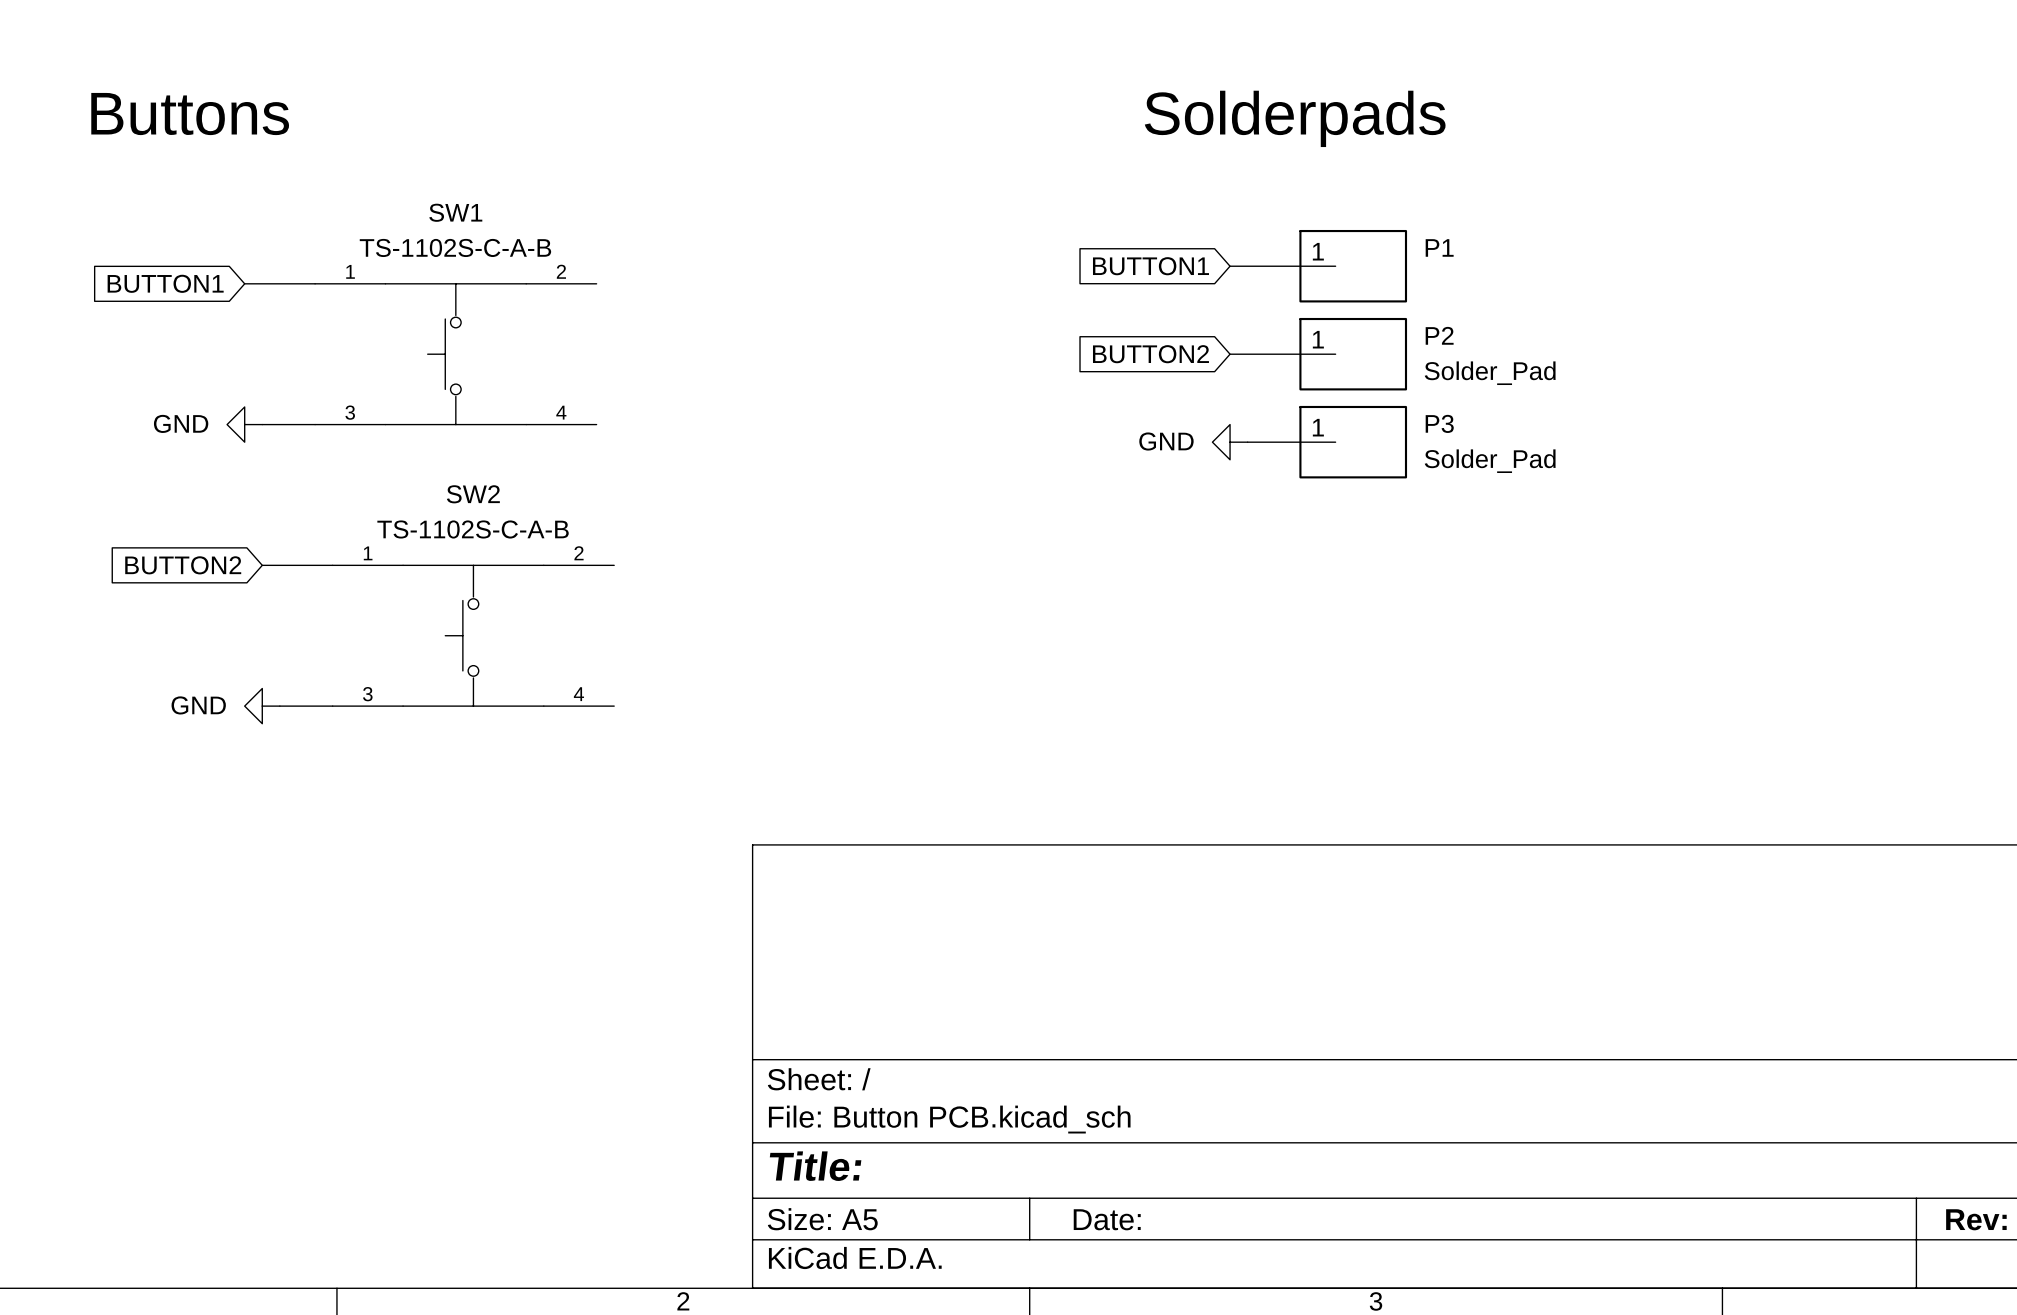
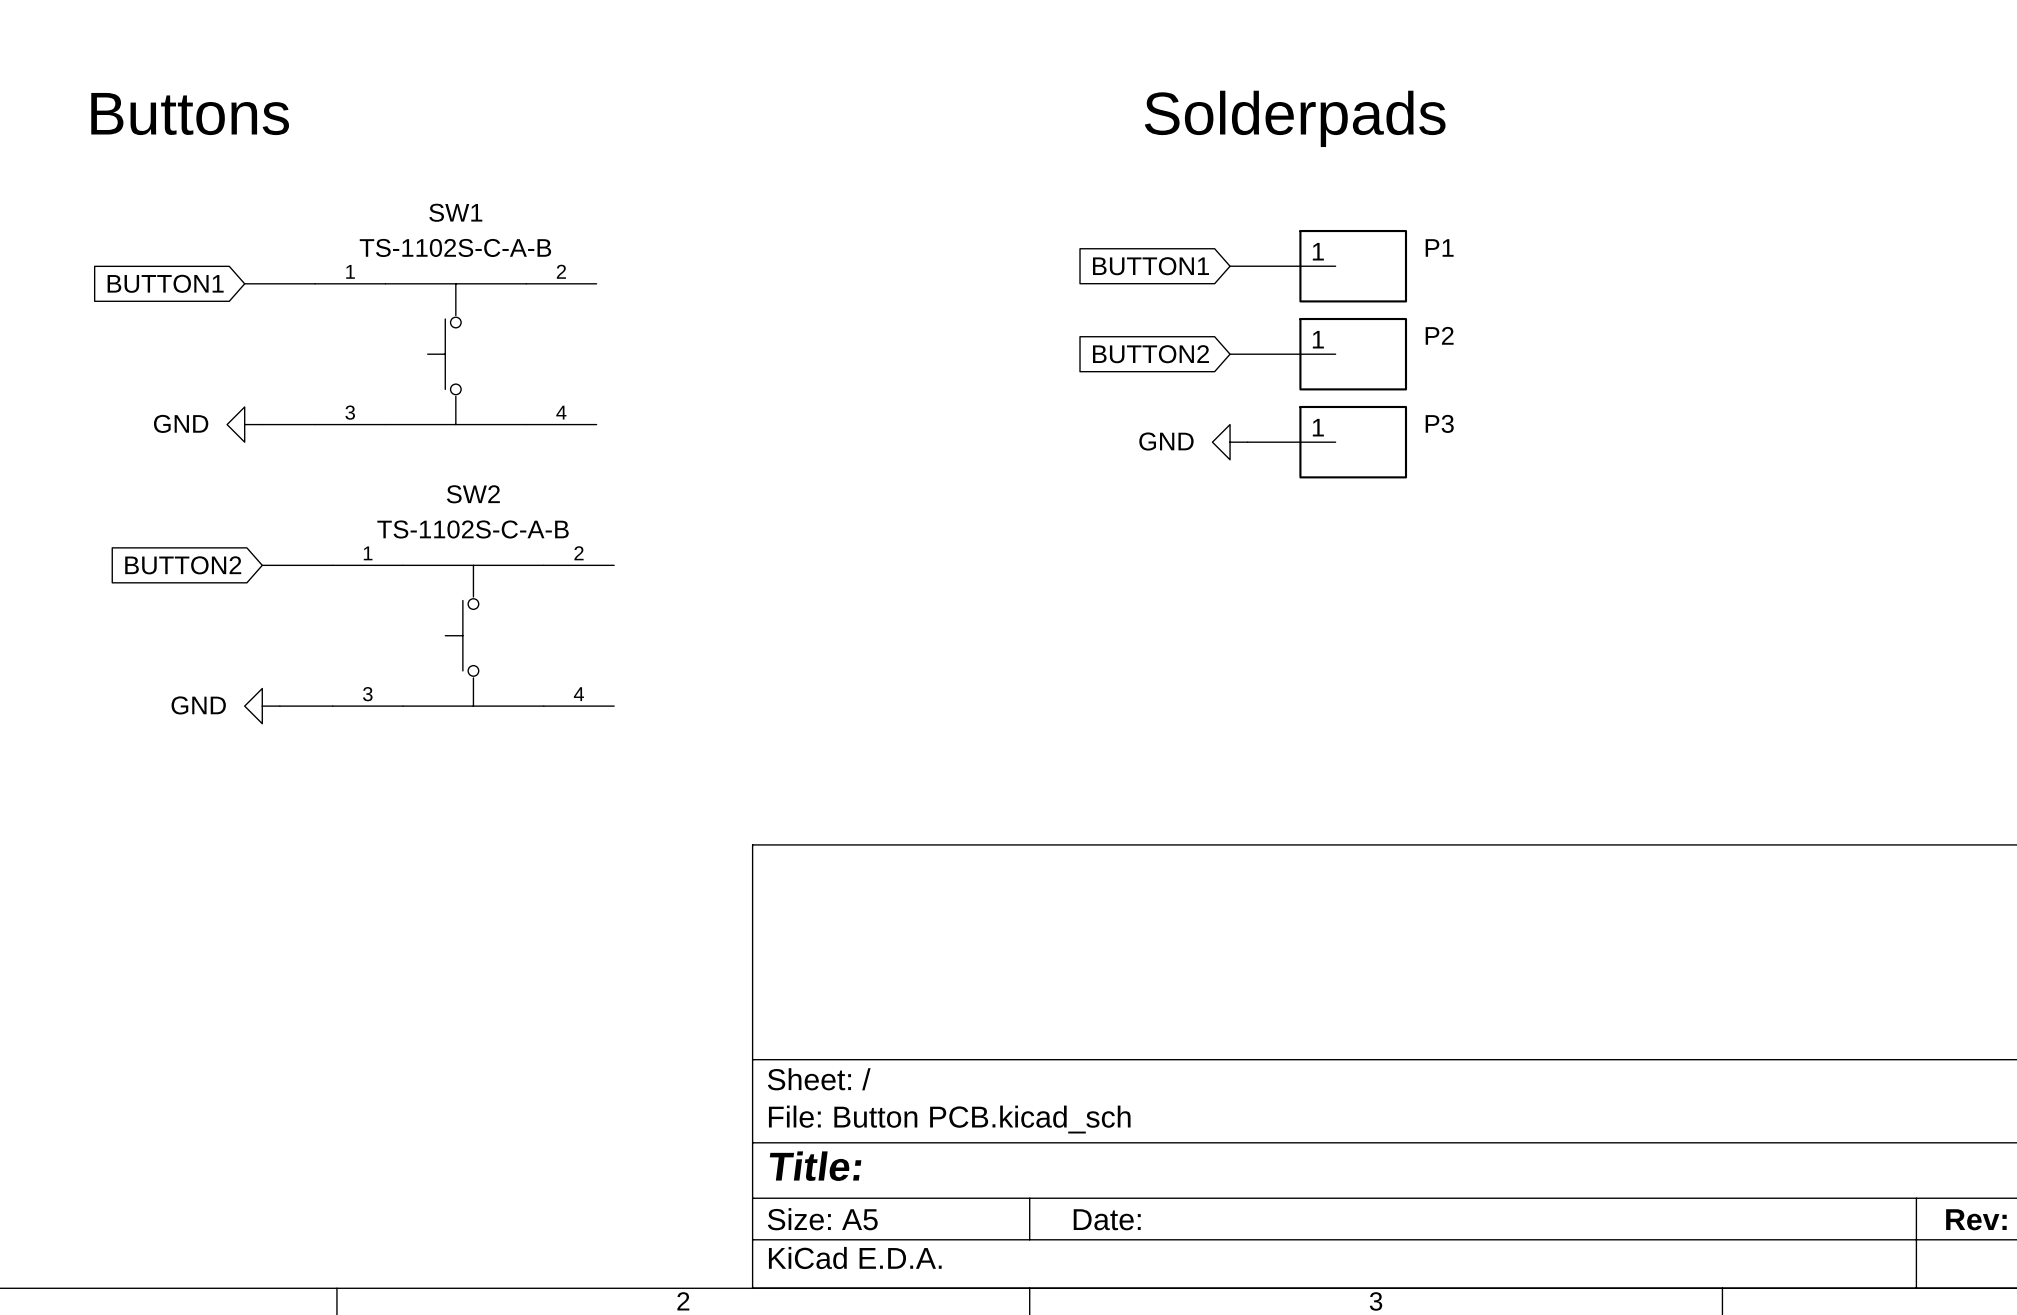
P2 value: Solder_Pad (1490, 373) -> none
P3 value: Solder_Pad (1490, 461) -> none

